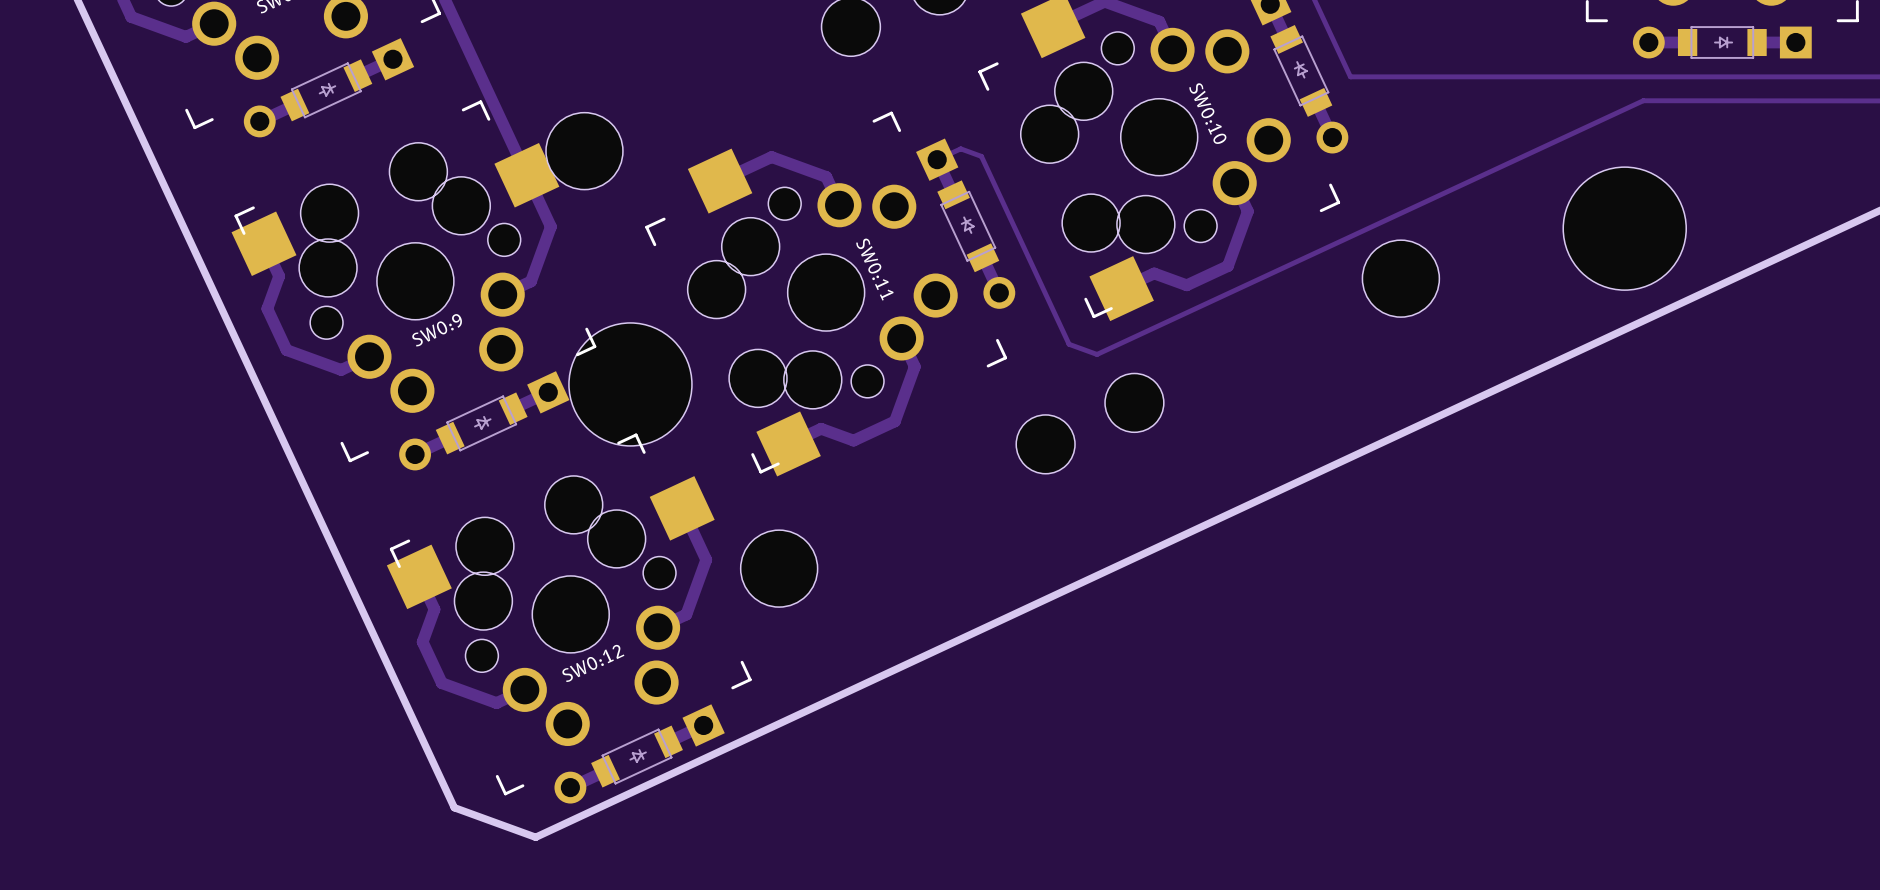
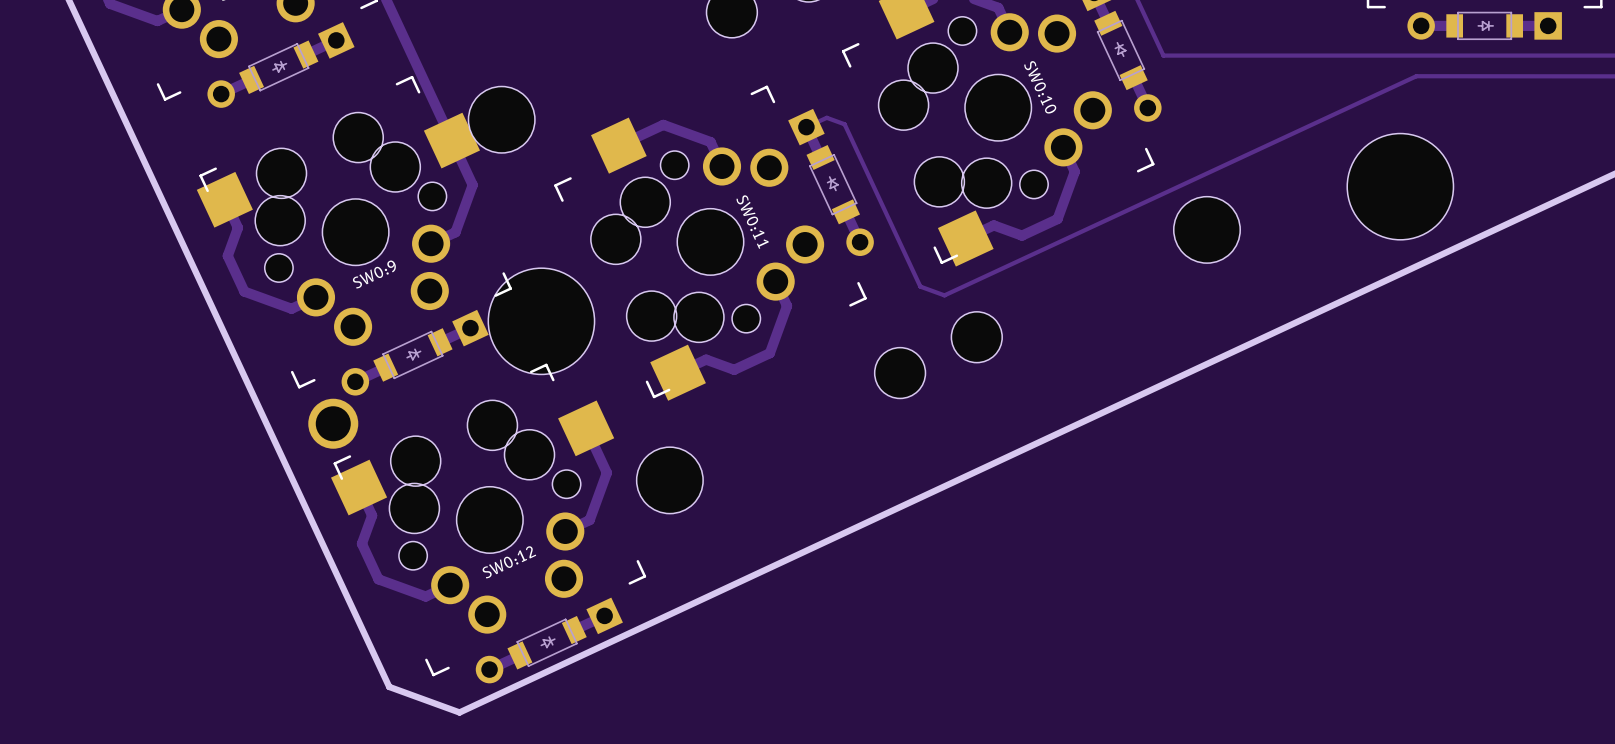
part: none -> (333, 423)

